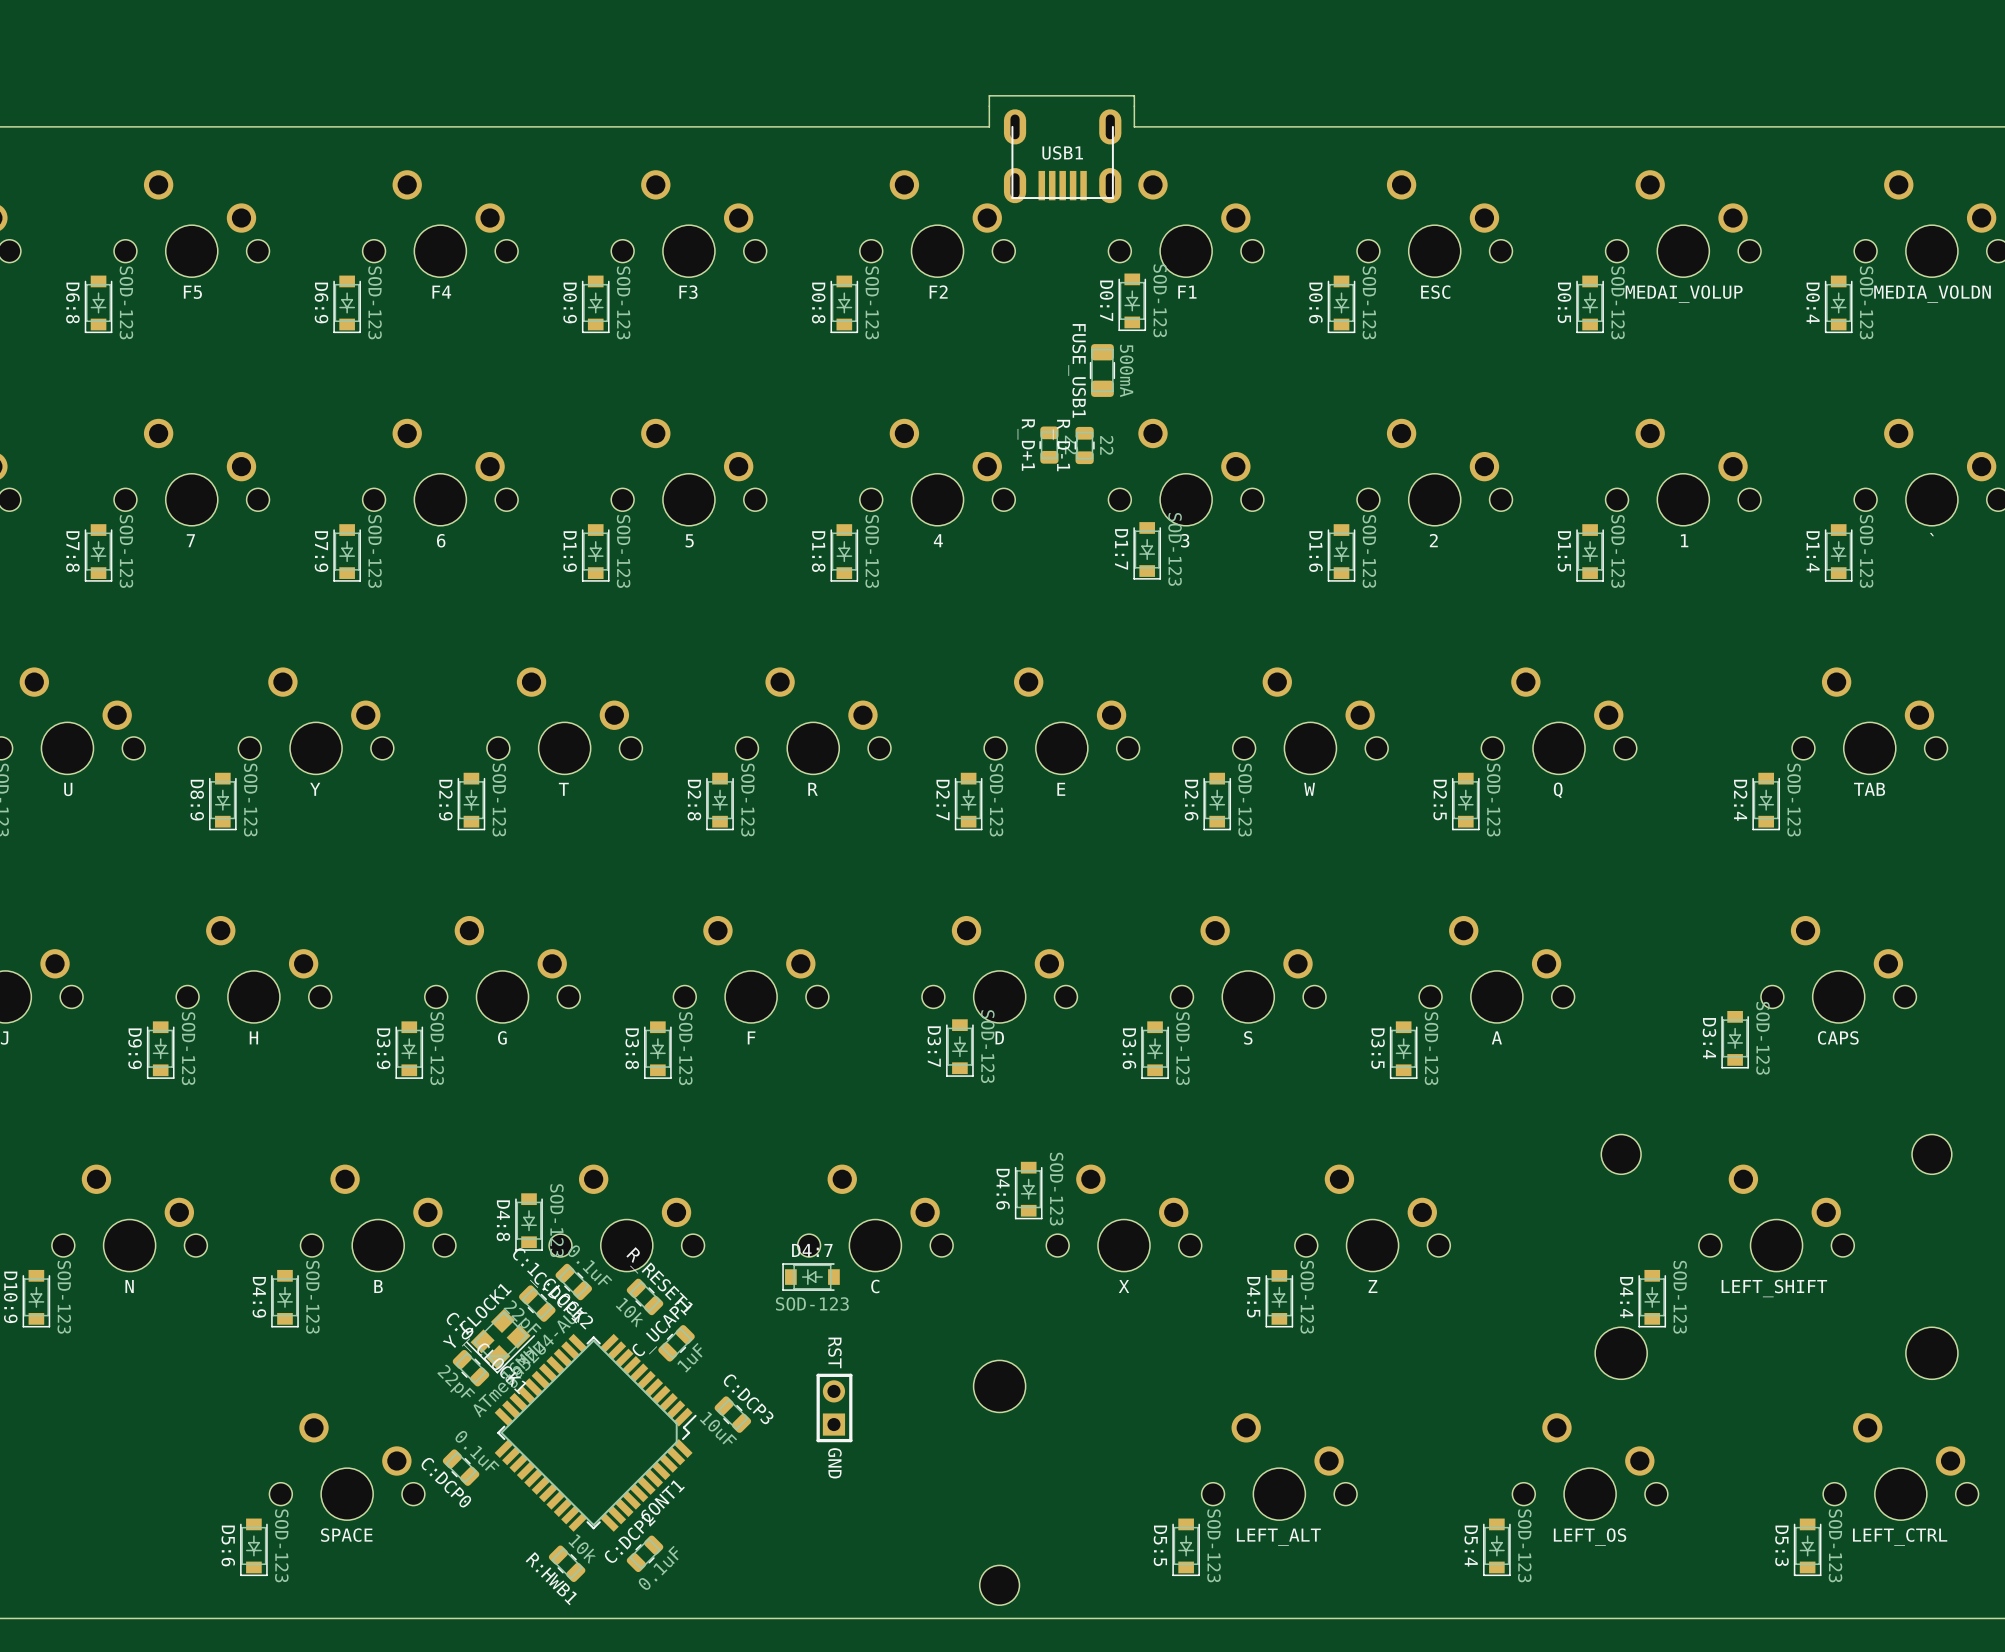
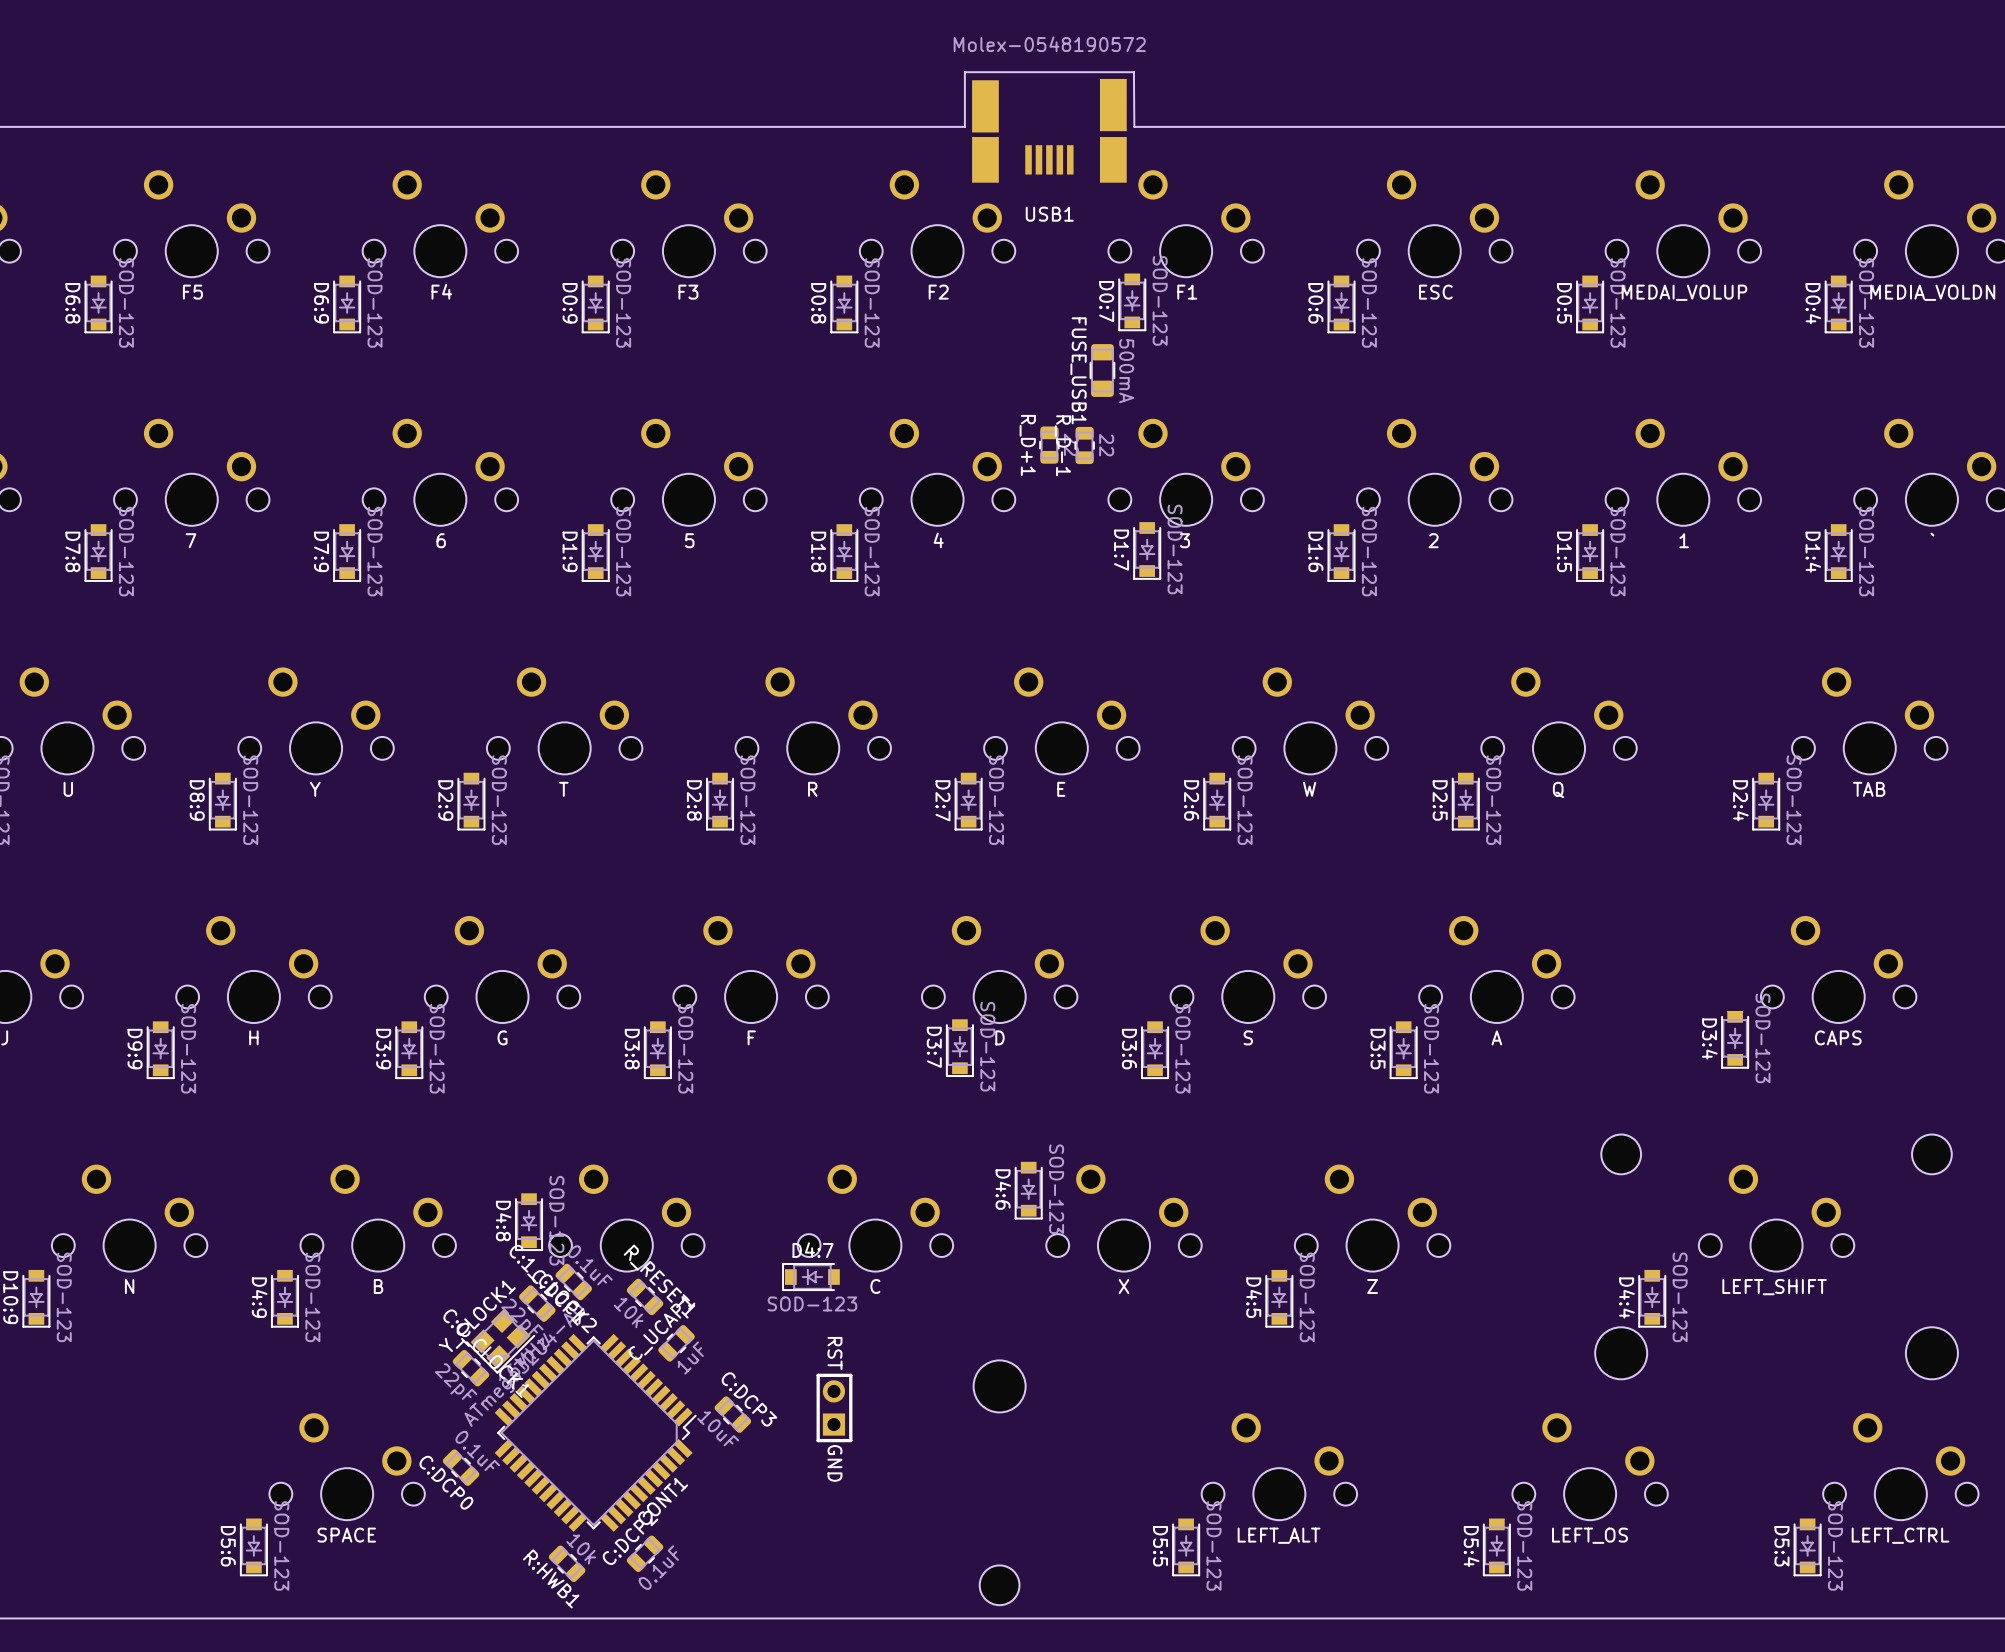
USB1 value: none -> Molex-0548190572 (1049, 44)
USB1 footprint: [1003, 109, 1122, 204] -> [972, 78, 1127, 183]
board edge: (1134, 126) (1134, 95) (989, 95) (989, 126) (964, 126) -> (1134, 126) (1133, 72) (964, 72) (964, 126)
USB1 name position: USB1 (1062, 152) -> USB1 (1049, 214)

